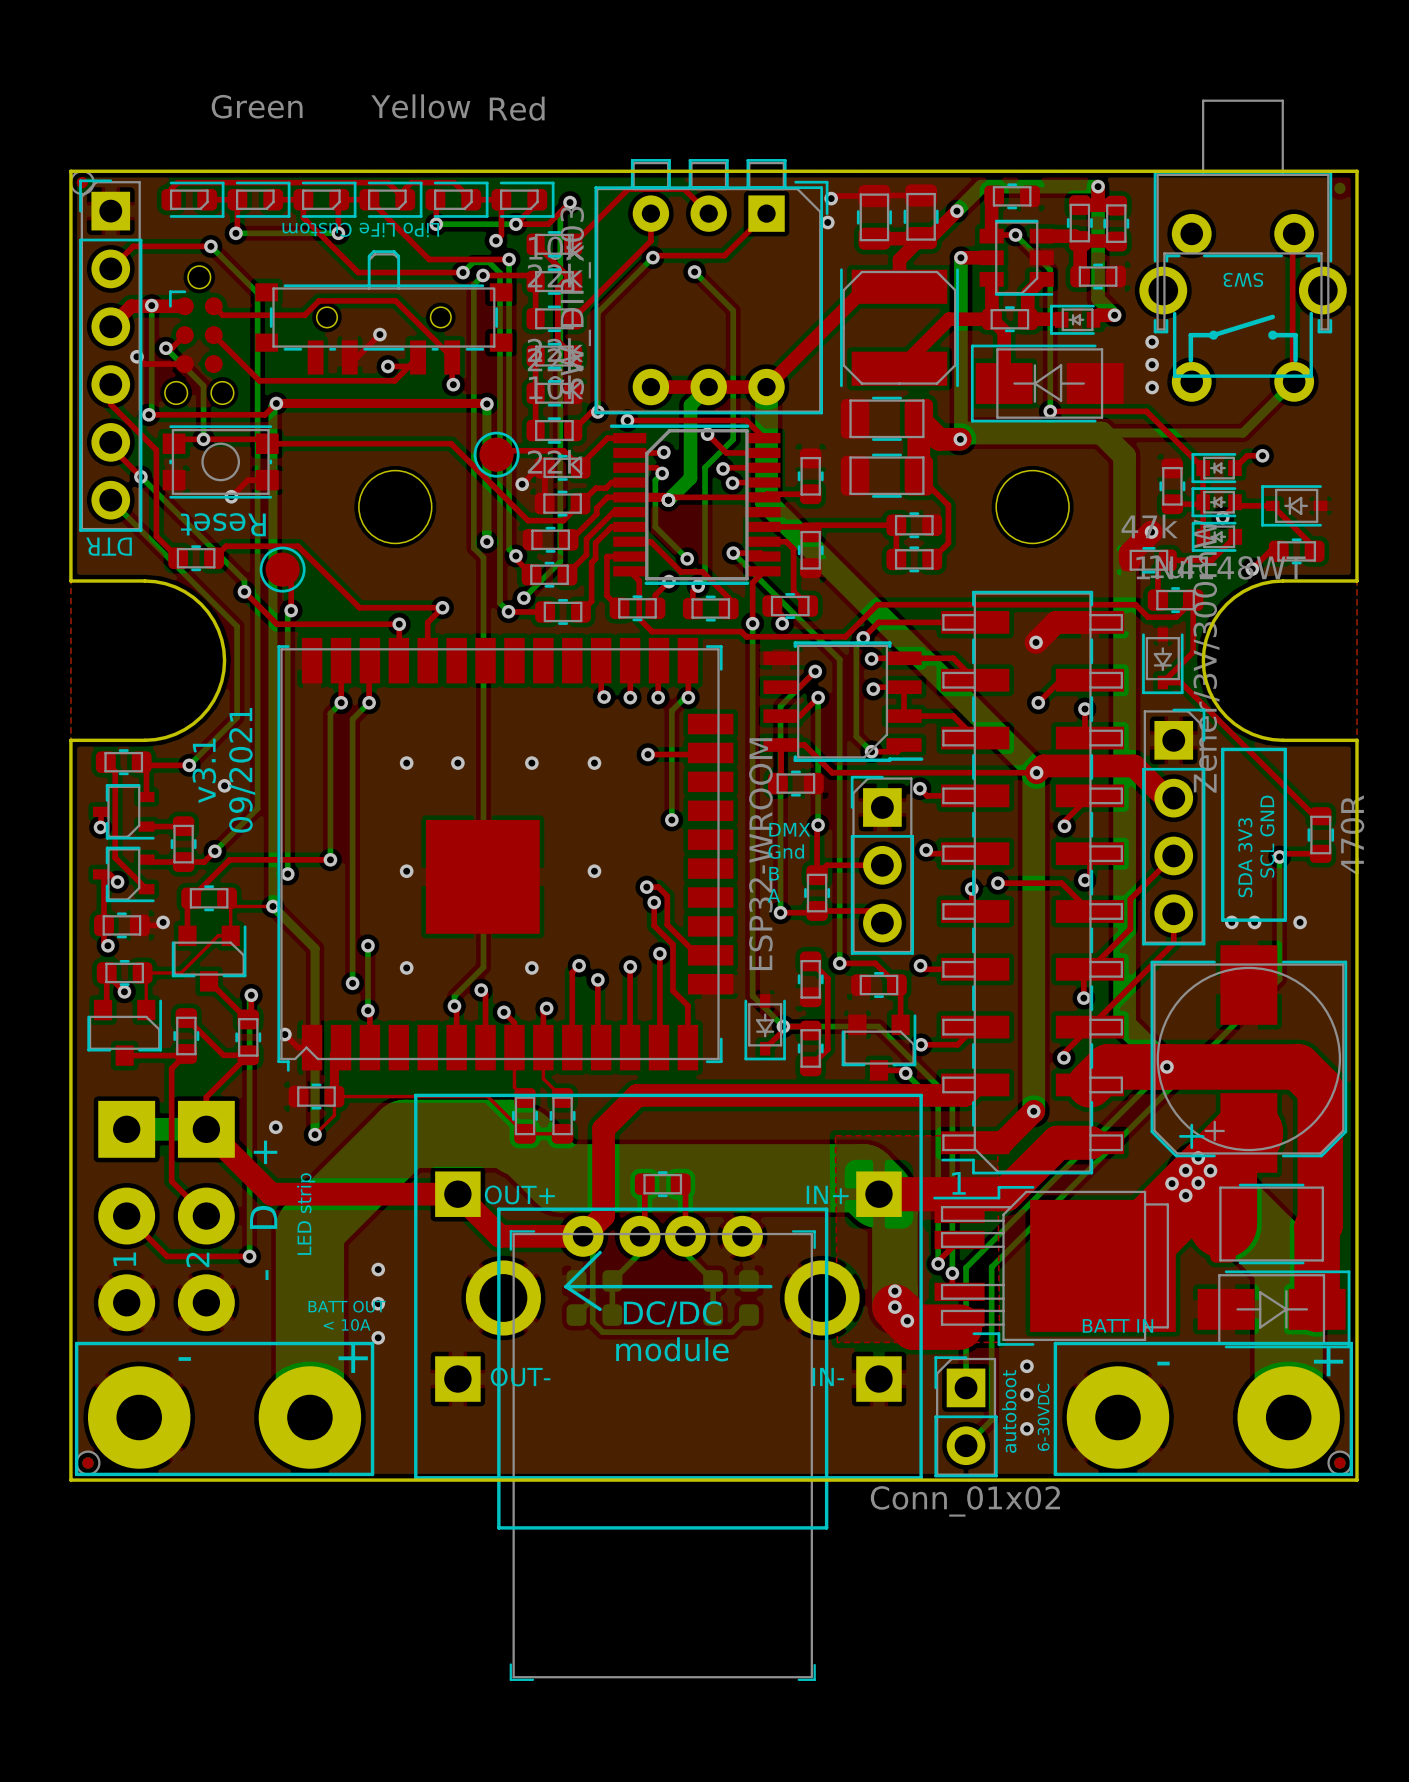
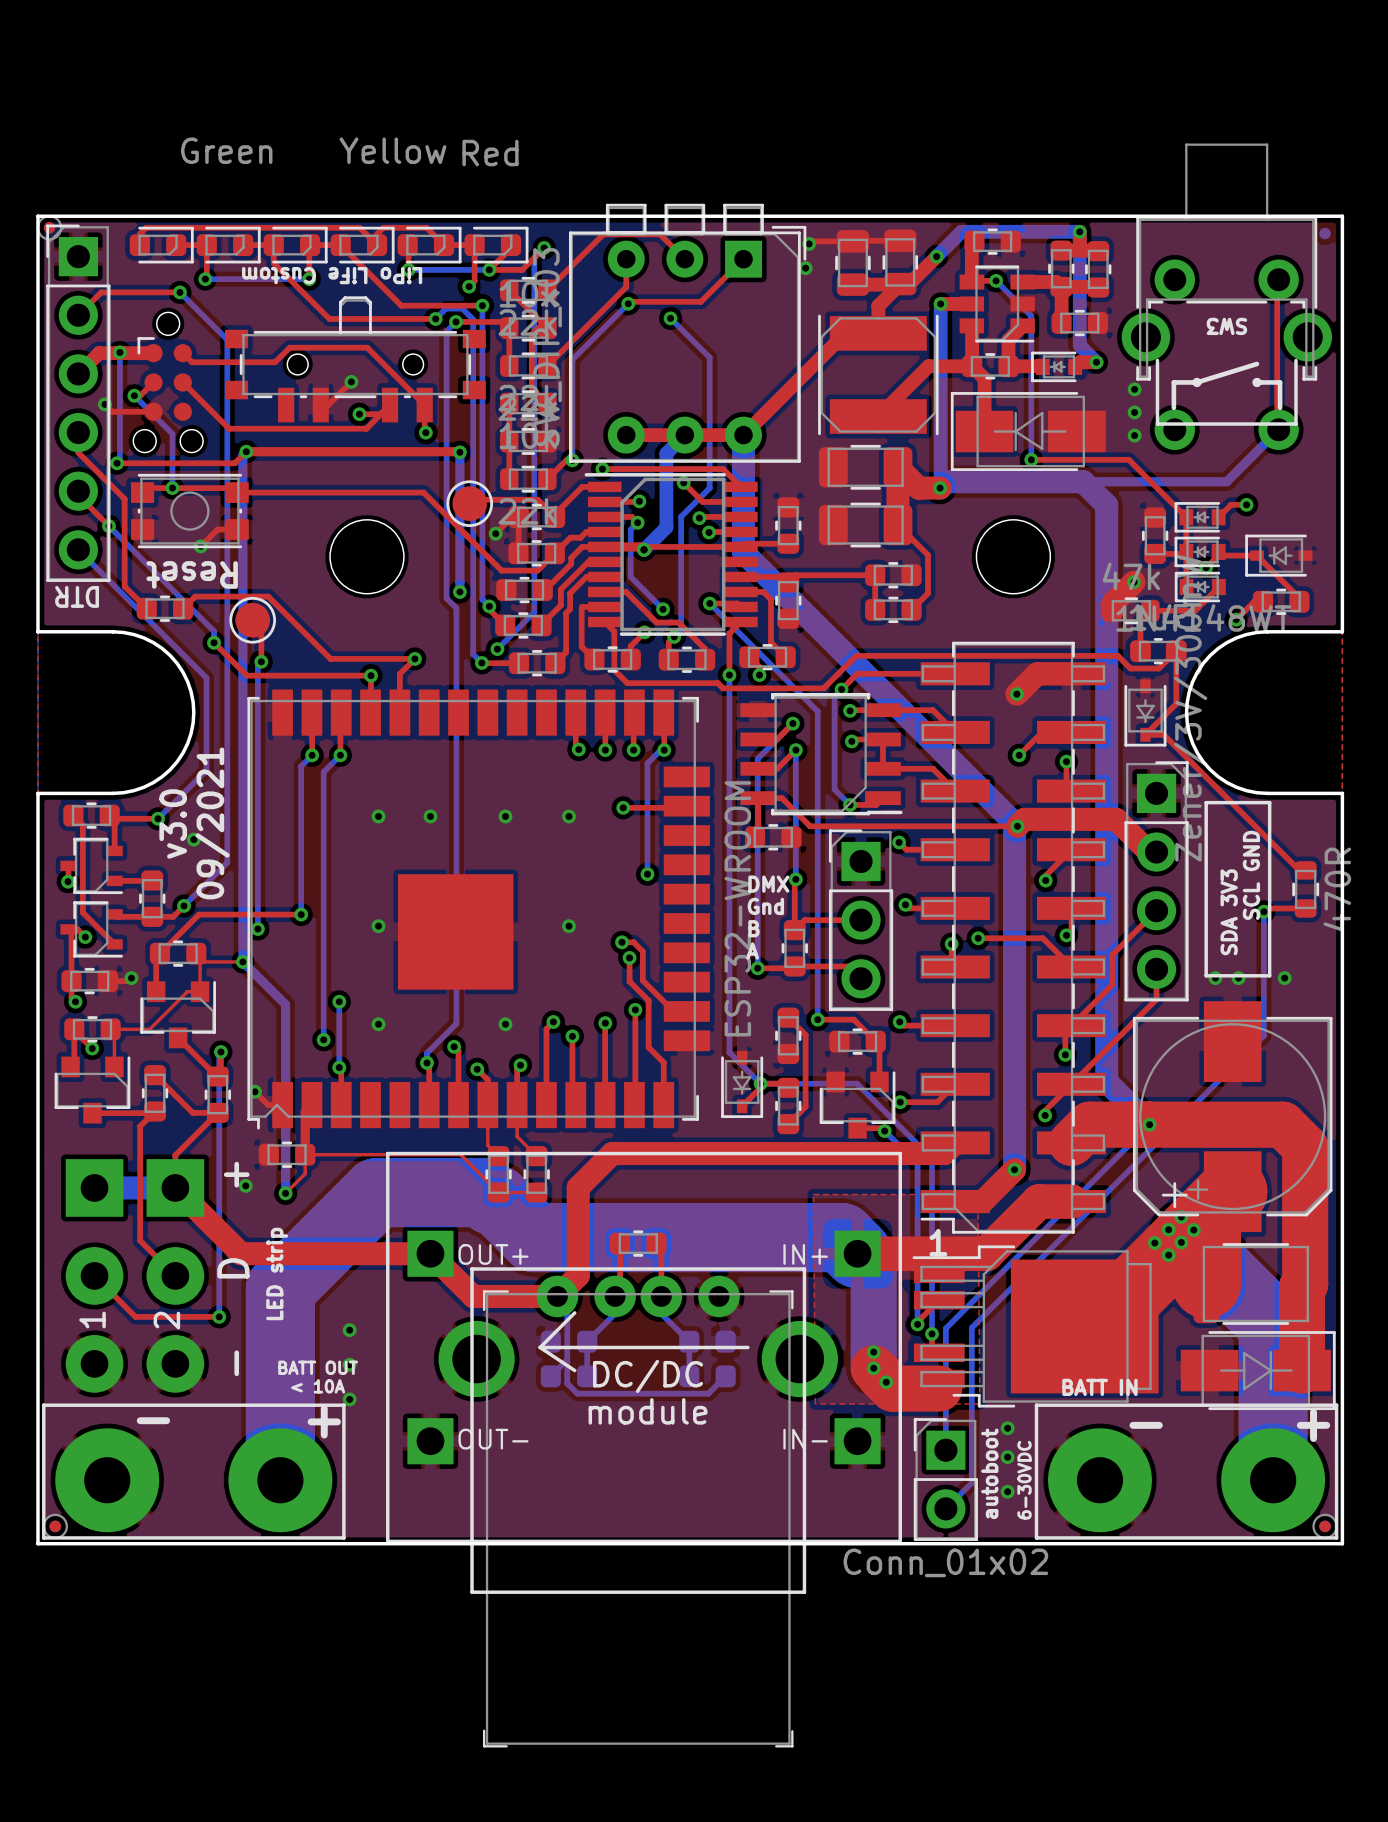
text: v3.1 (204, 770) -> v3.0 (173, 823)

